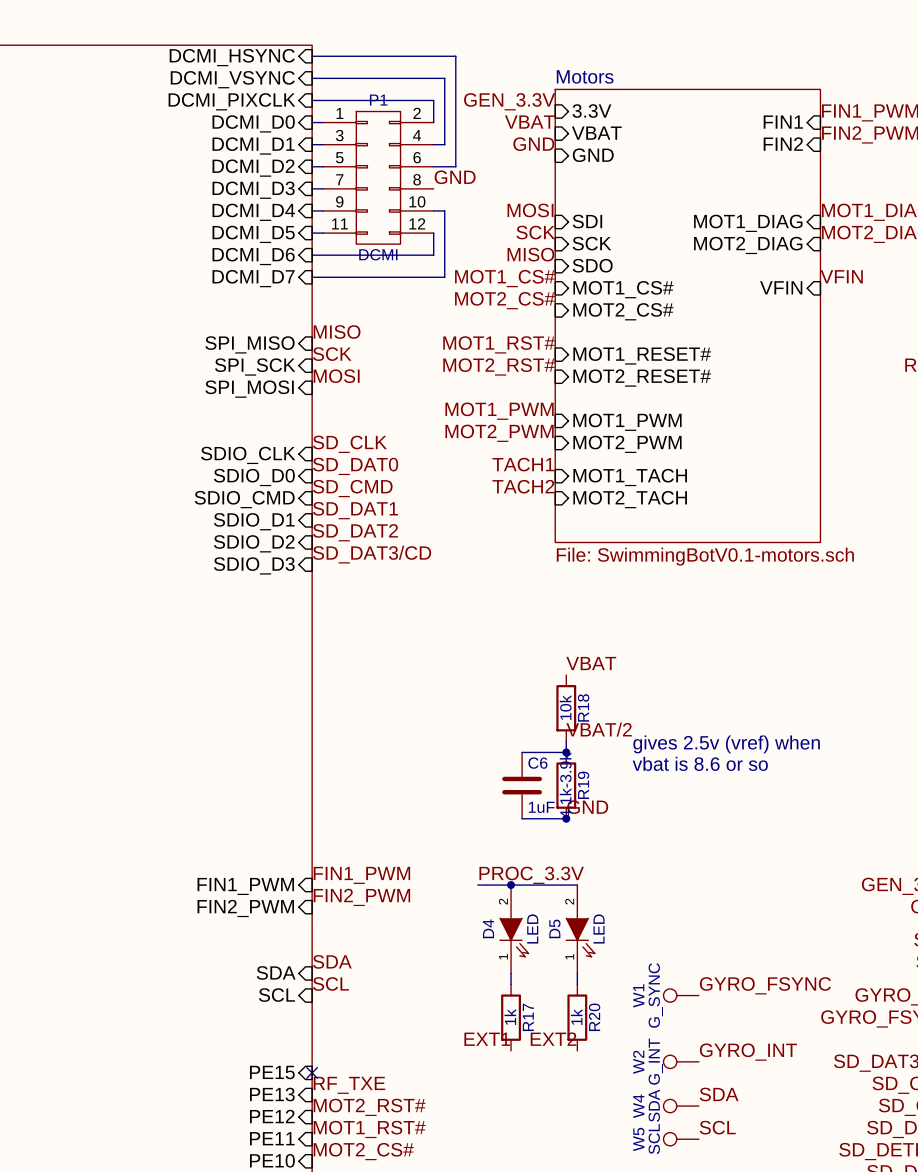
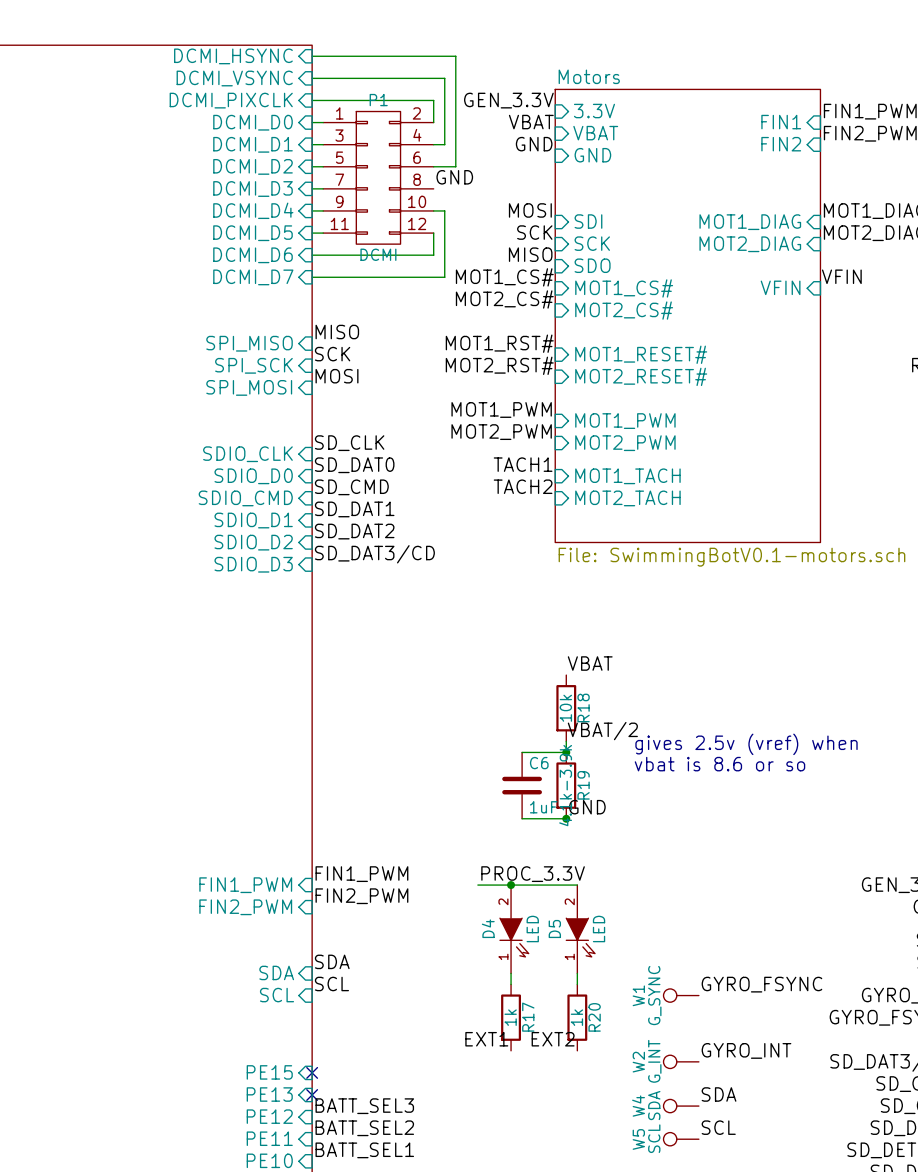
label: RF_TXE (349, 1085) -> none
no-connect mark: none -> (312, 1095)
label: MOT2_RST# (369, 1107) -> BATT_SEL3 (364, 1106)
label: MOT1_RST# (369, 1129) -> BATT_SEL2 (364, 1128)
label: MOT2_CS# (363, 1151) -> BATT_SEL1 (364, 1150)

